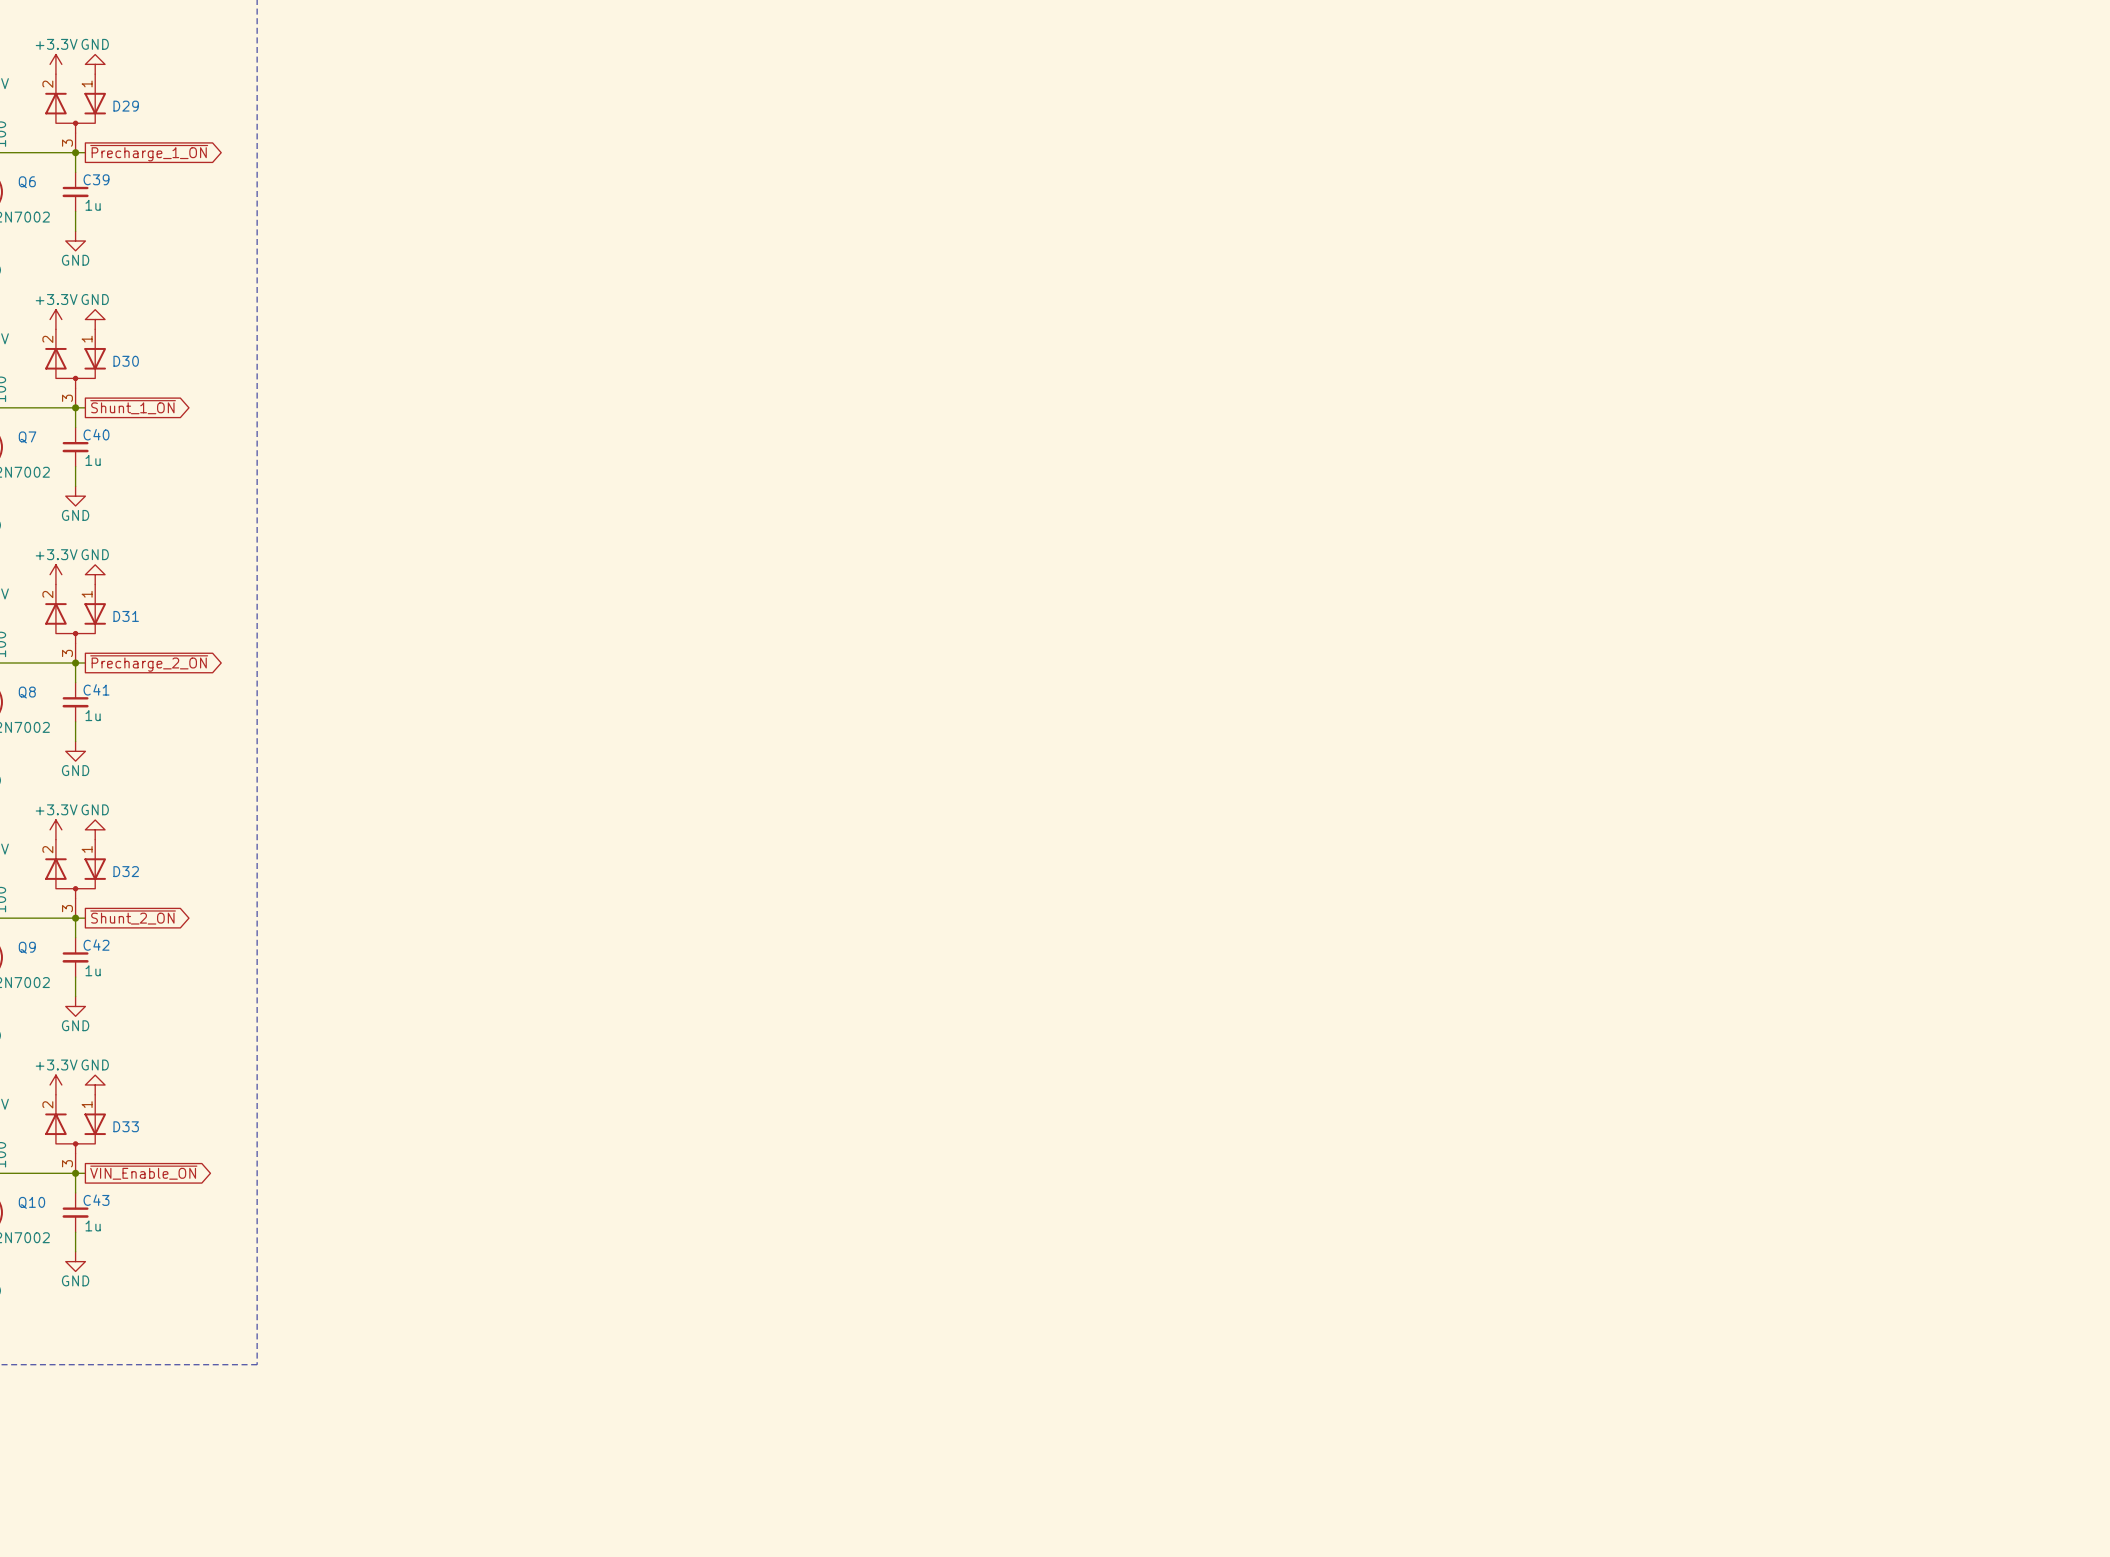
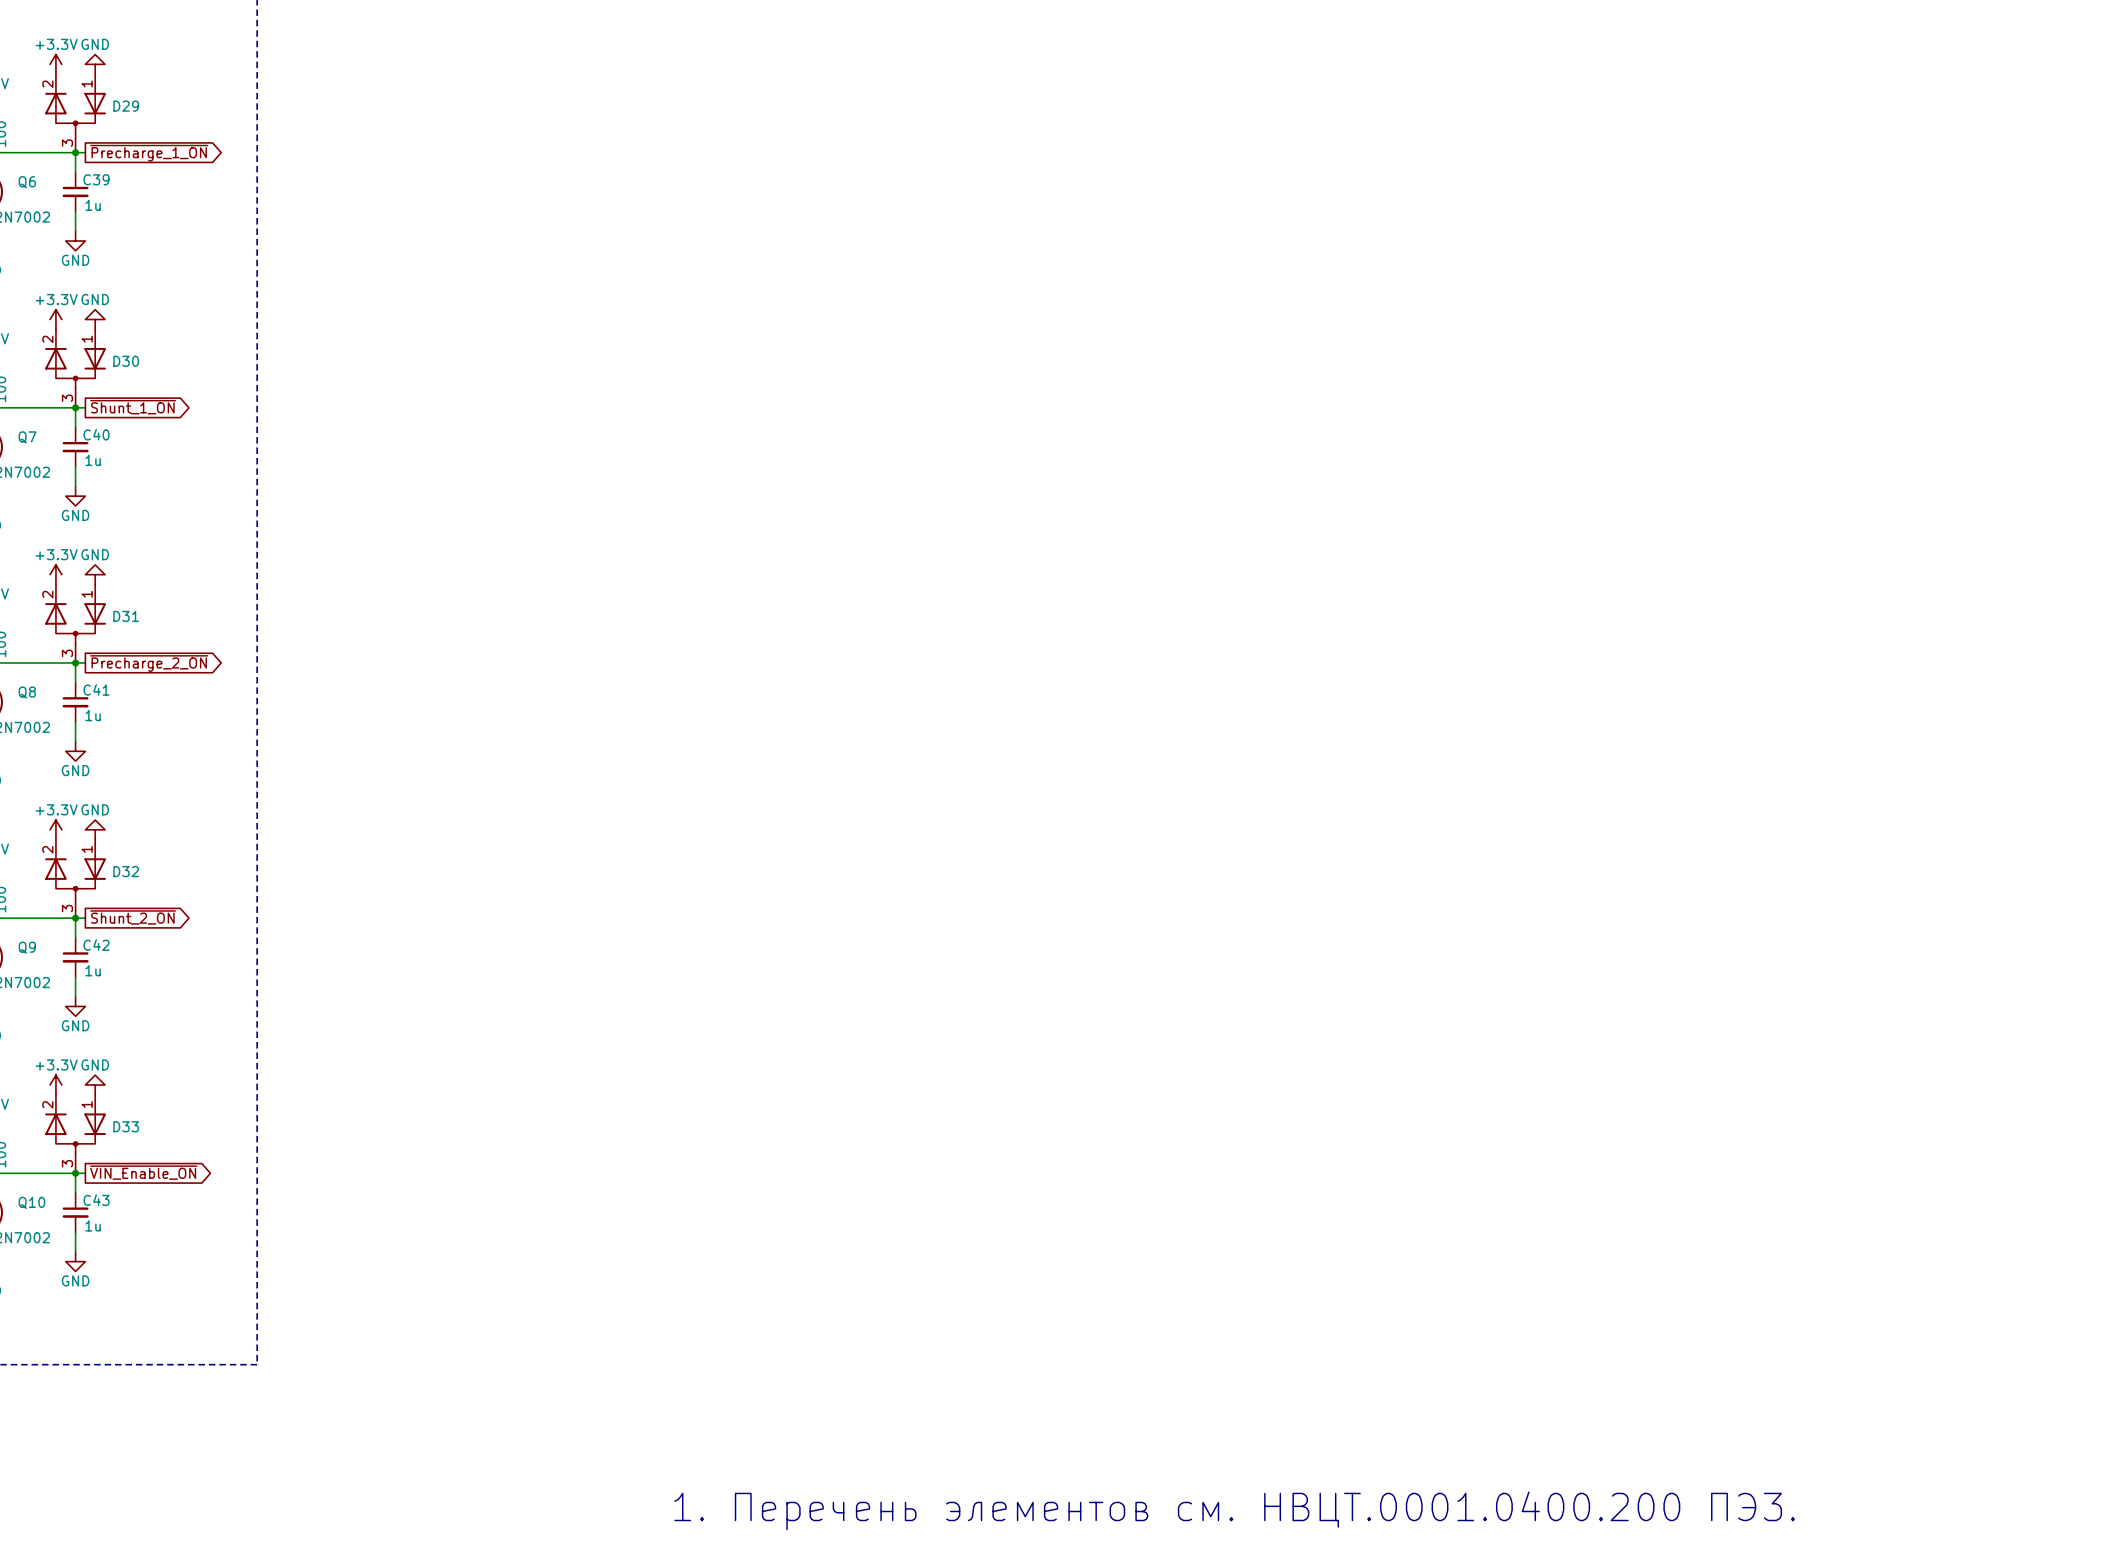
text: none -> 1. Перечень элементов см. НВЦТ.0001.0400.200 ПЭ3. (1234, 1510)

